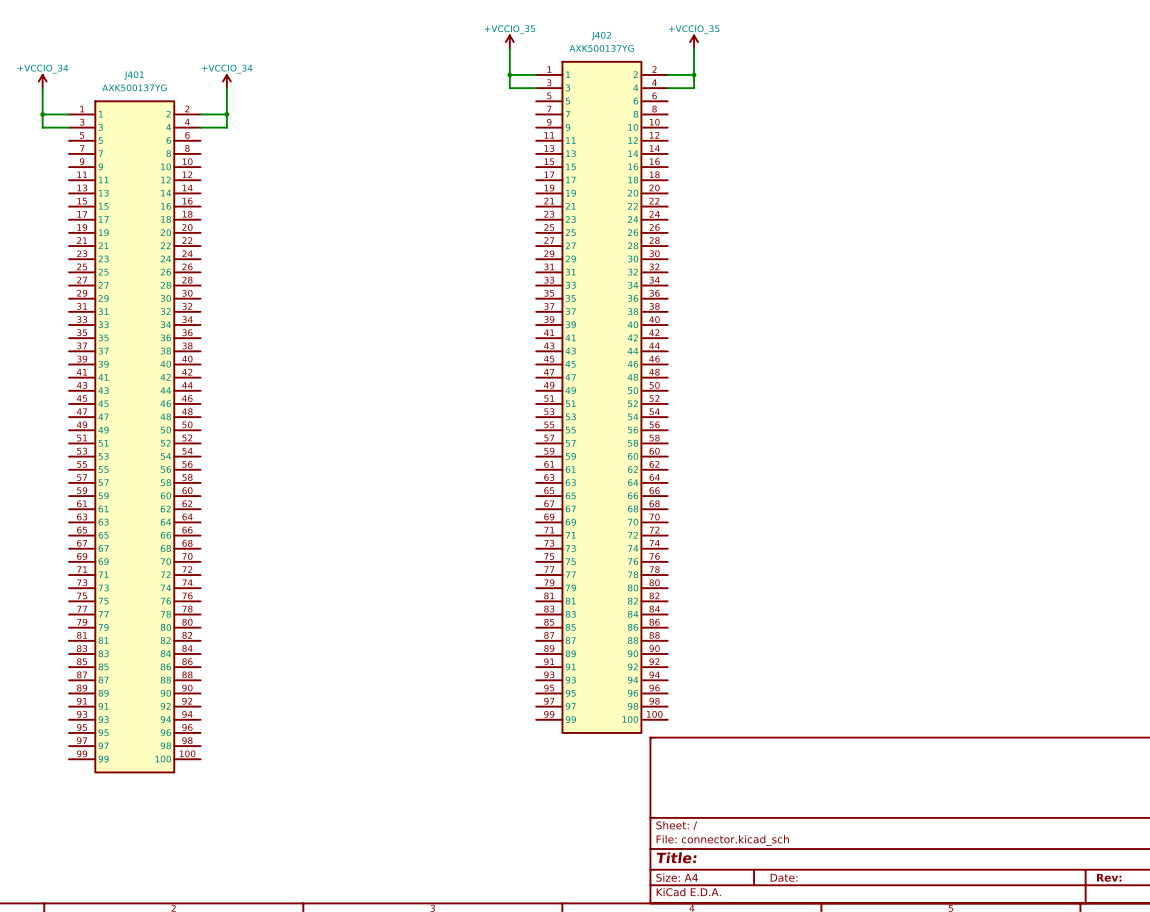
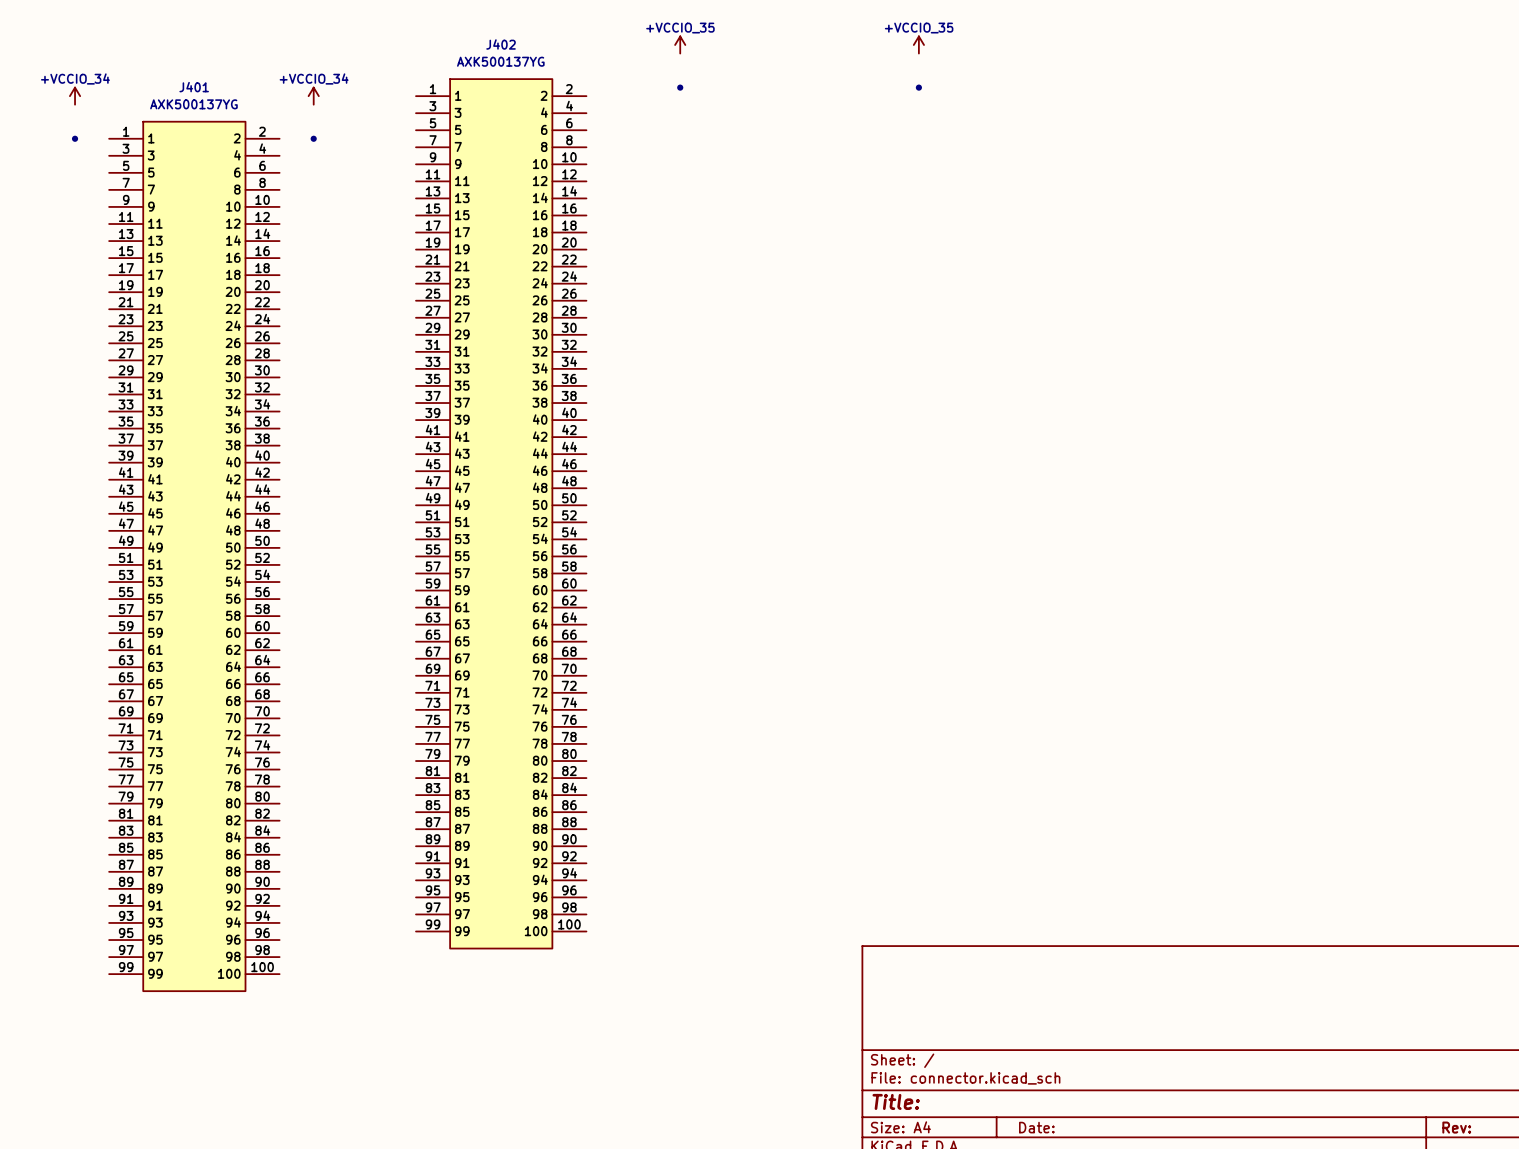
wire: (509, 48) (509, 88) (536, 88) -> none
wire: (694, 48) (694, 88) (667, 88) -> none
wire: (509, 74) (536, 74) -> none
wire: (667, 74) (694, 74) -> none
wire: (42, 88) (42, 127) (68, 127) -> none
wire: (226, 88) (226, 127) (200, 127) -> none
wire: (42, 114) (68, 114) -> none
wire: (200, 114) (226, 114) -> none
J402 position: (601, 397) -> (501, 513)

